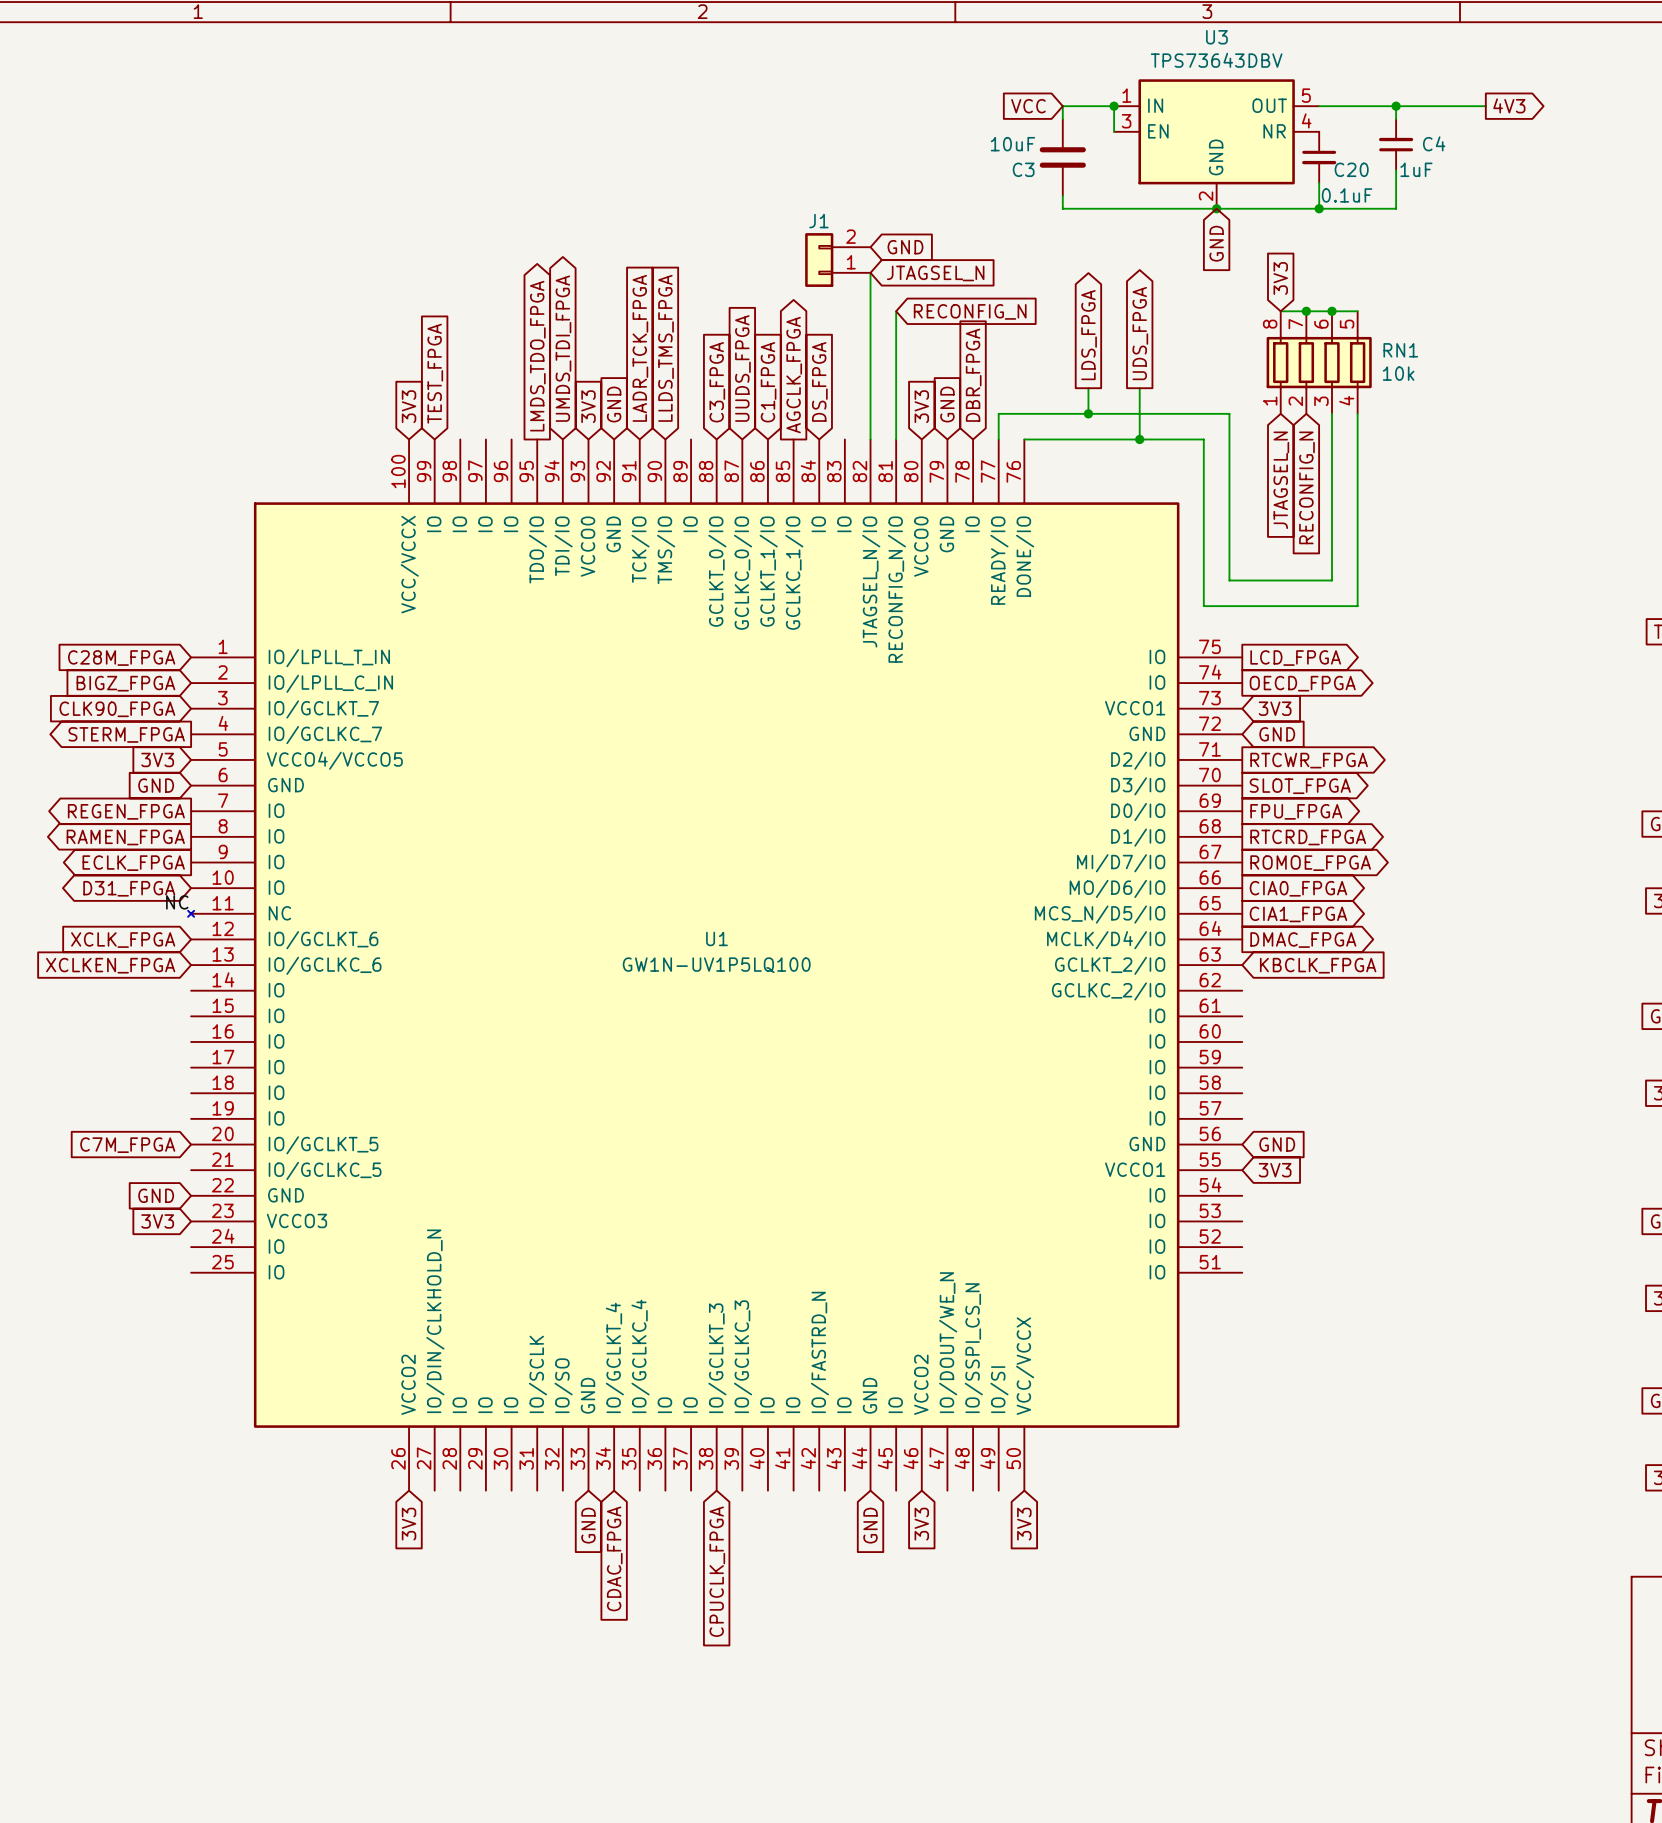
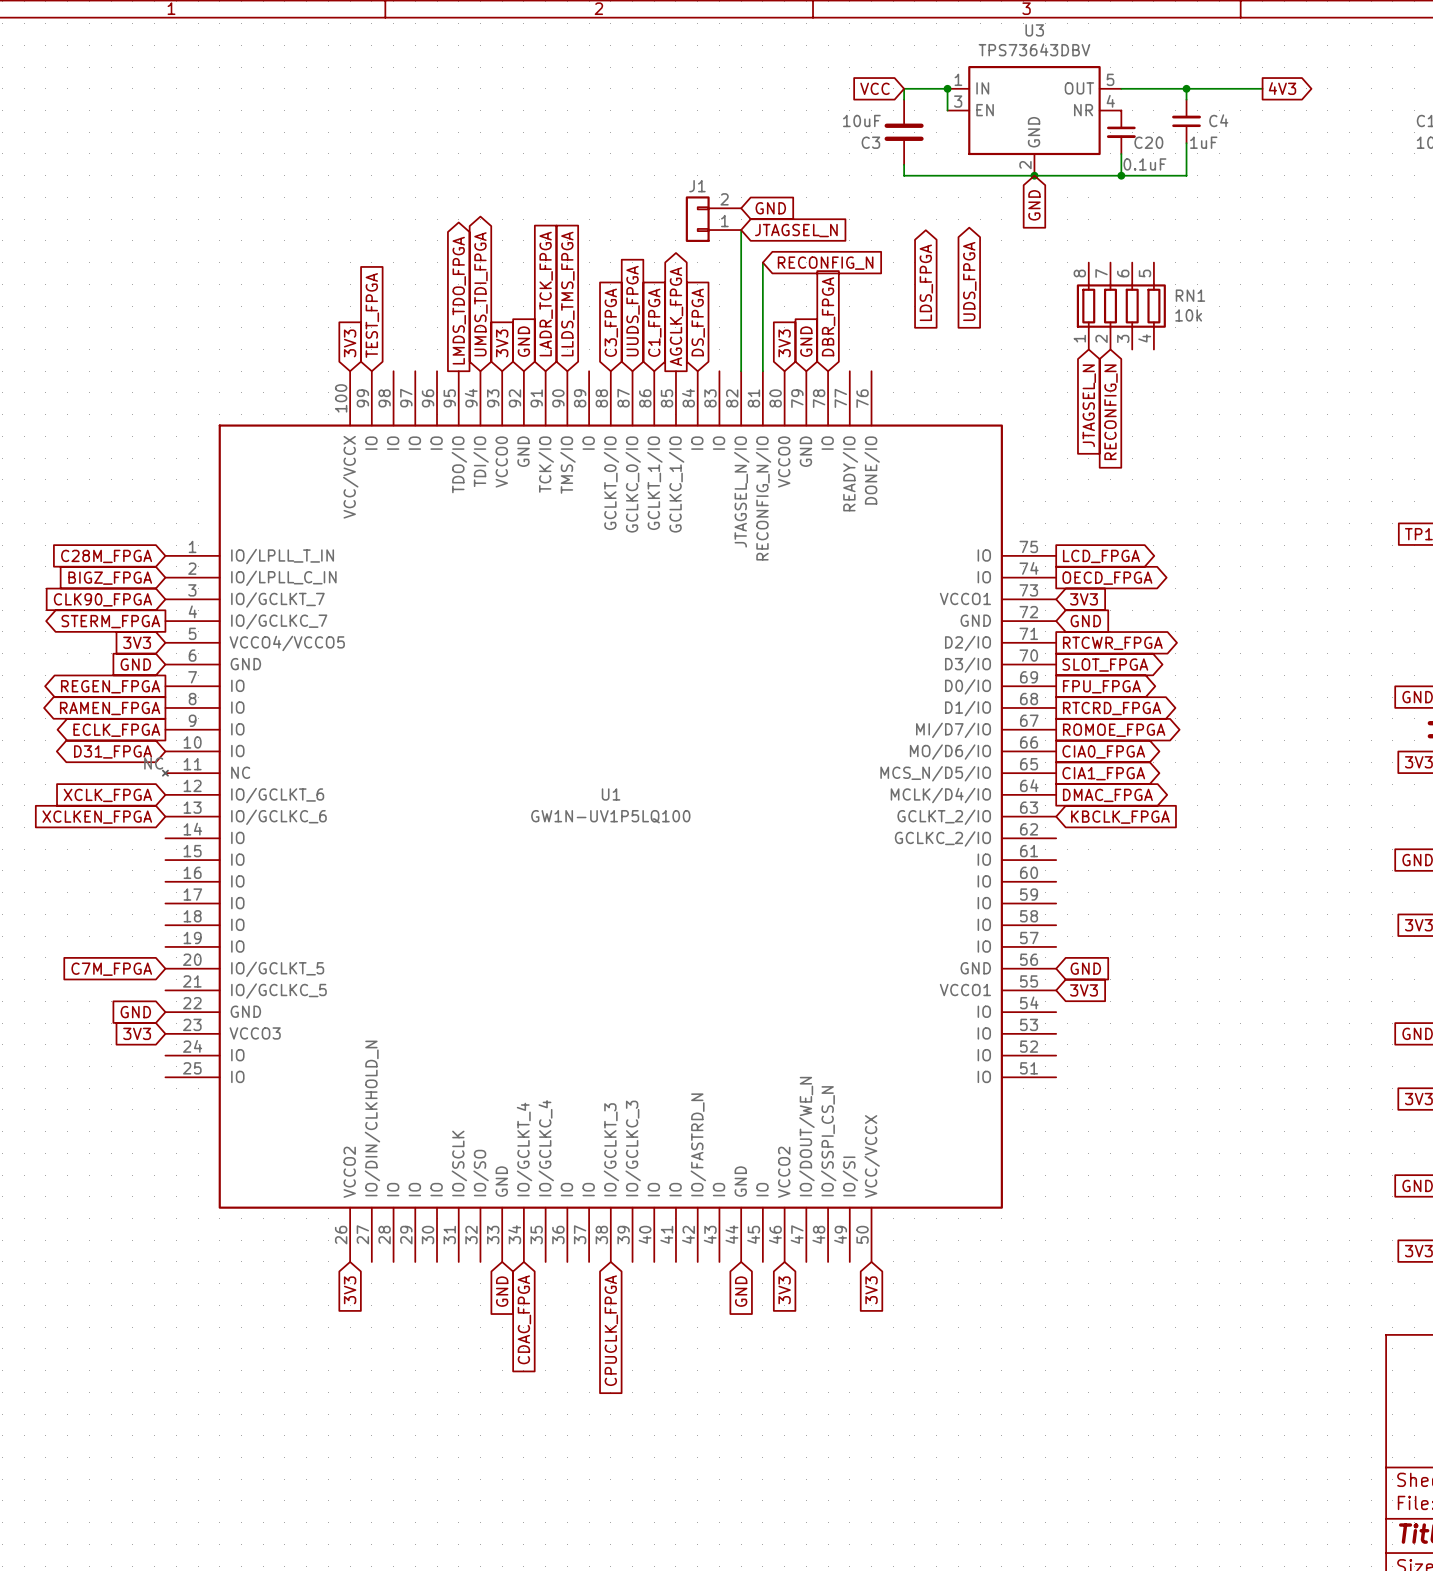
global label: 3V3 (1280, 278) -> none
wire: (1280, 311) (1357, 311) -> none
junction: (1306, 311) -> none
junction: (1332, 311) -> none
wire: (1088, 388) (1088, 413) -> none
wire: (1139, 388) (1139, 439) -> none
junction: (1088, 413) -> none
wire: (1332, 413) (1332, 580) (1229, 580) (1229, 413) (998, 413) (998, 439) -> none
wire: (1357, 413) (1357, 606) (1203, 606) (1203, 439) (1024, 439) -> none
junction: (1139, 439) -> none

